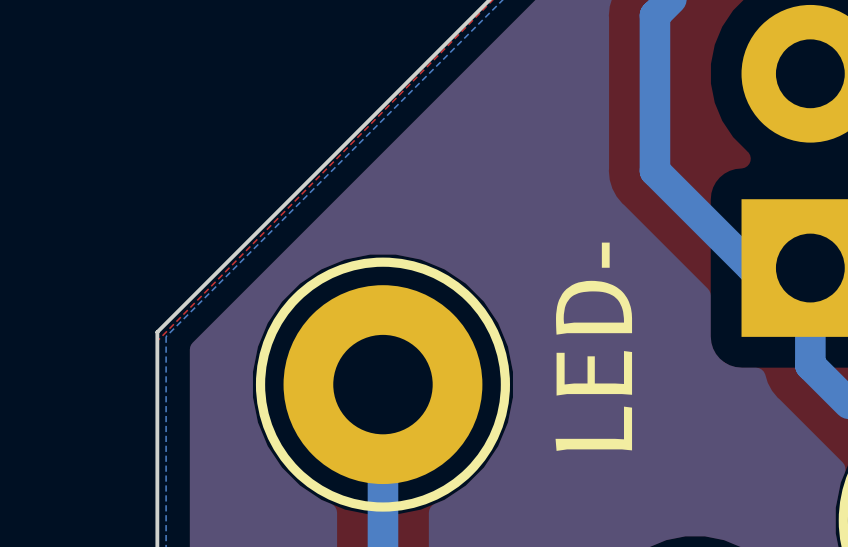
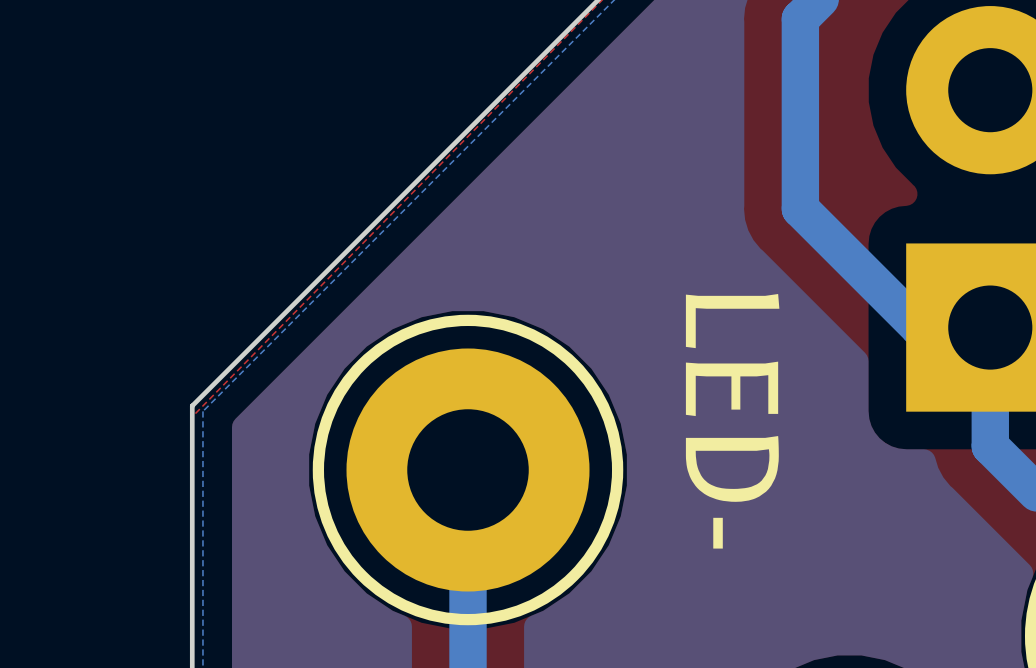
LED- name: none -> LED- (732, 421)
text: LED- (593, 346) -> none

